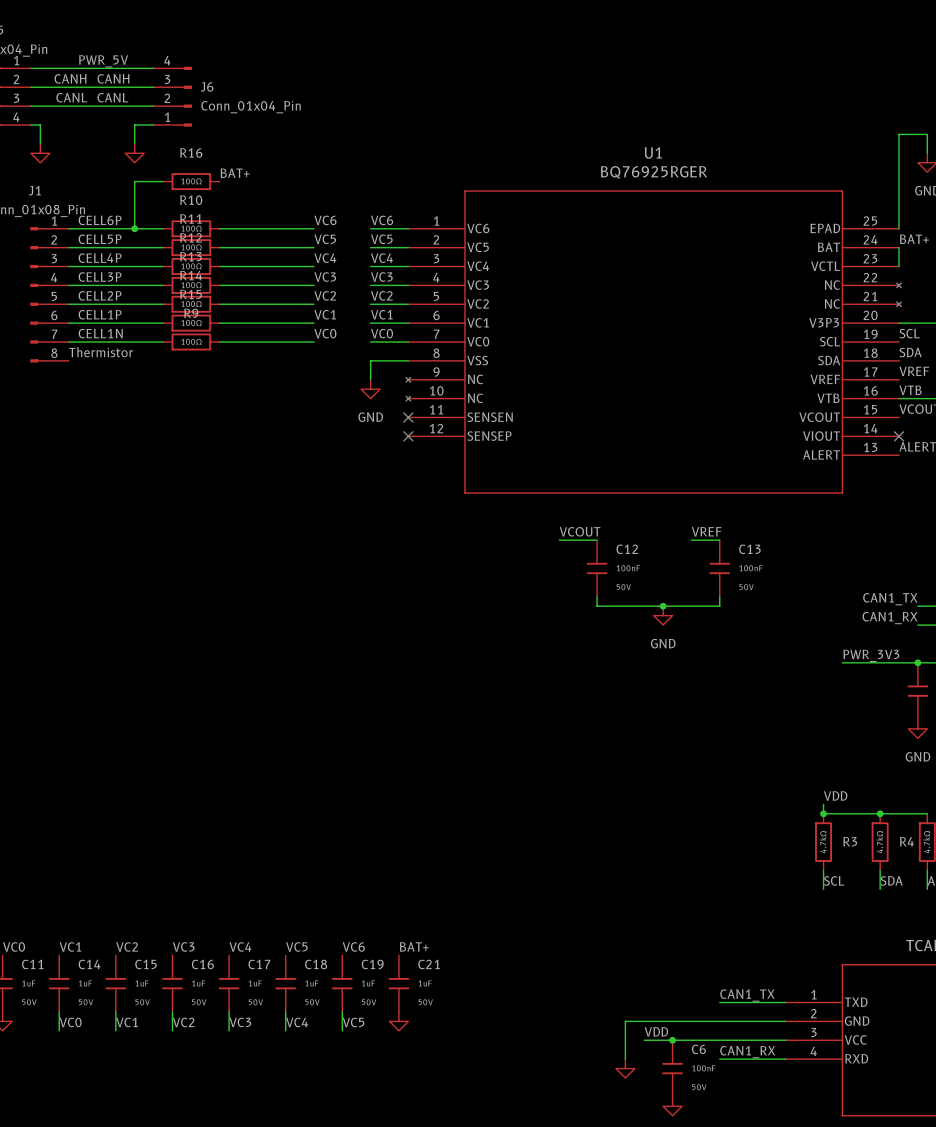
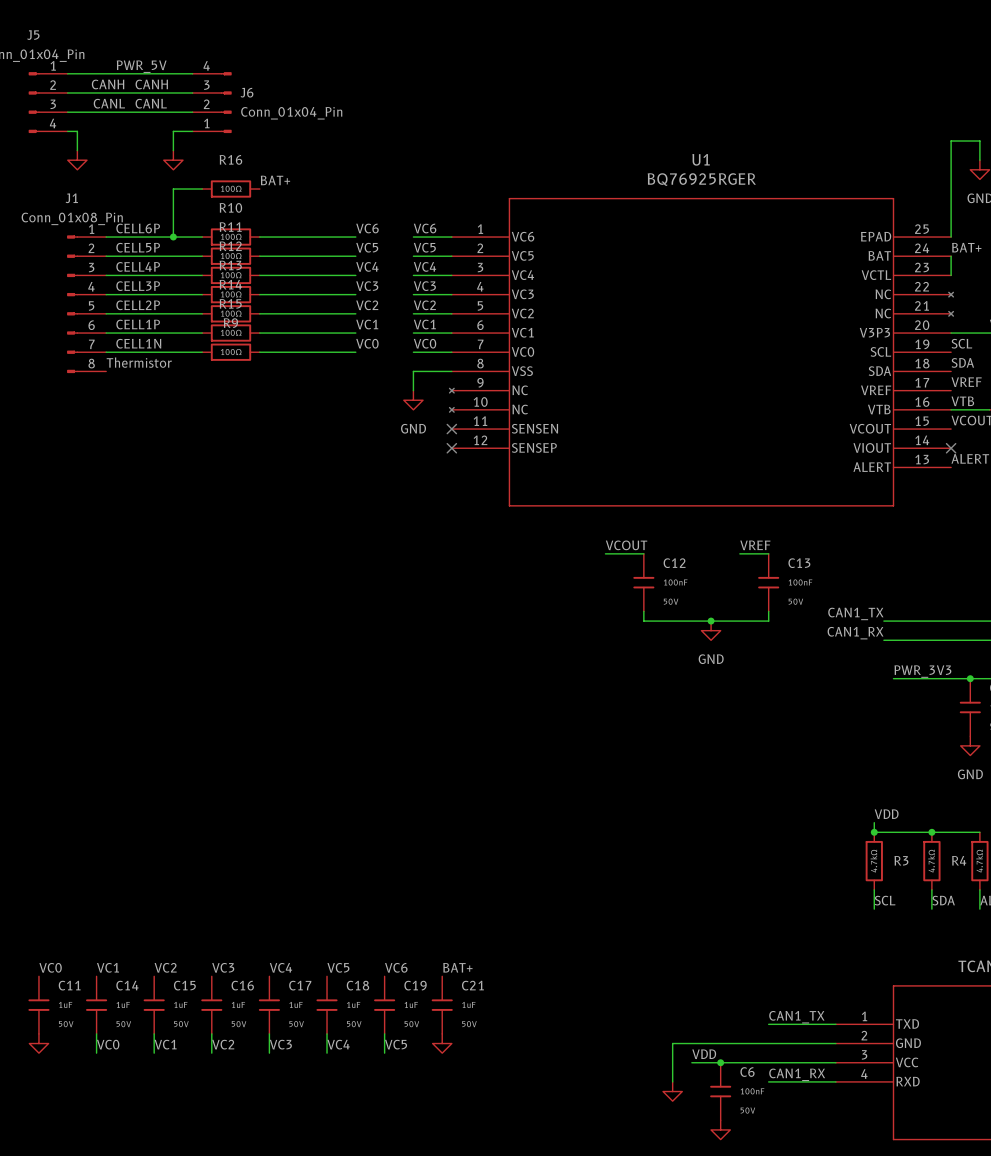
label position: CAN1_TX (890, 599) -> CAN1_TX (855, 613)
wire: none -> (883, 621) (970, 621)
label position: CAN1_RX (890, 618) -> CAN1_RX (855, 633)
wire: none -> (883, 640) (970, 640)

